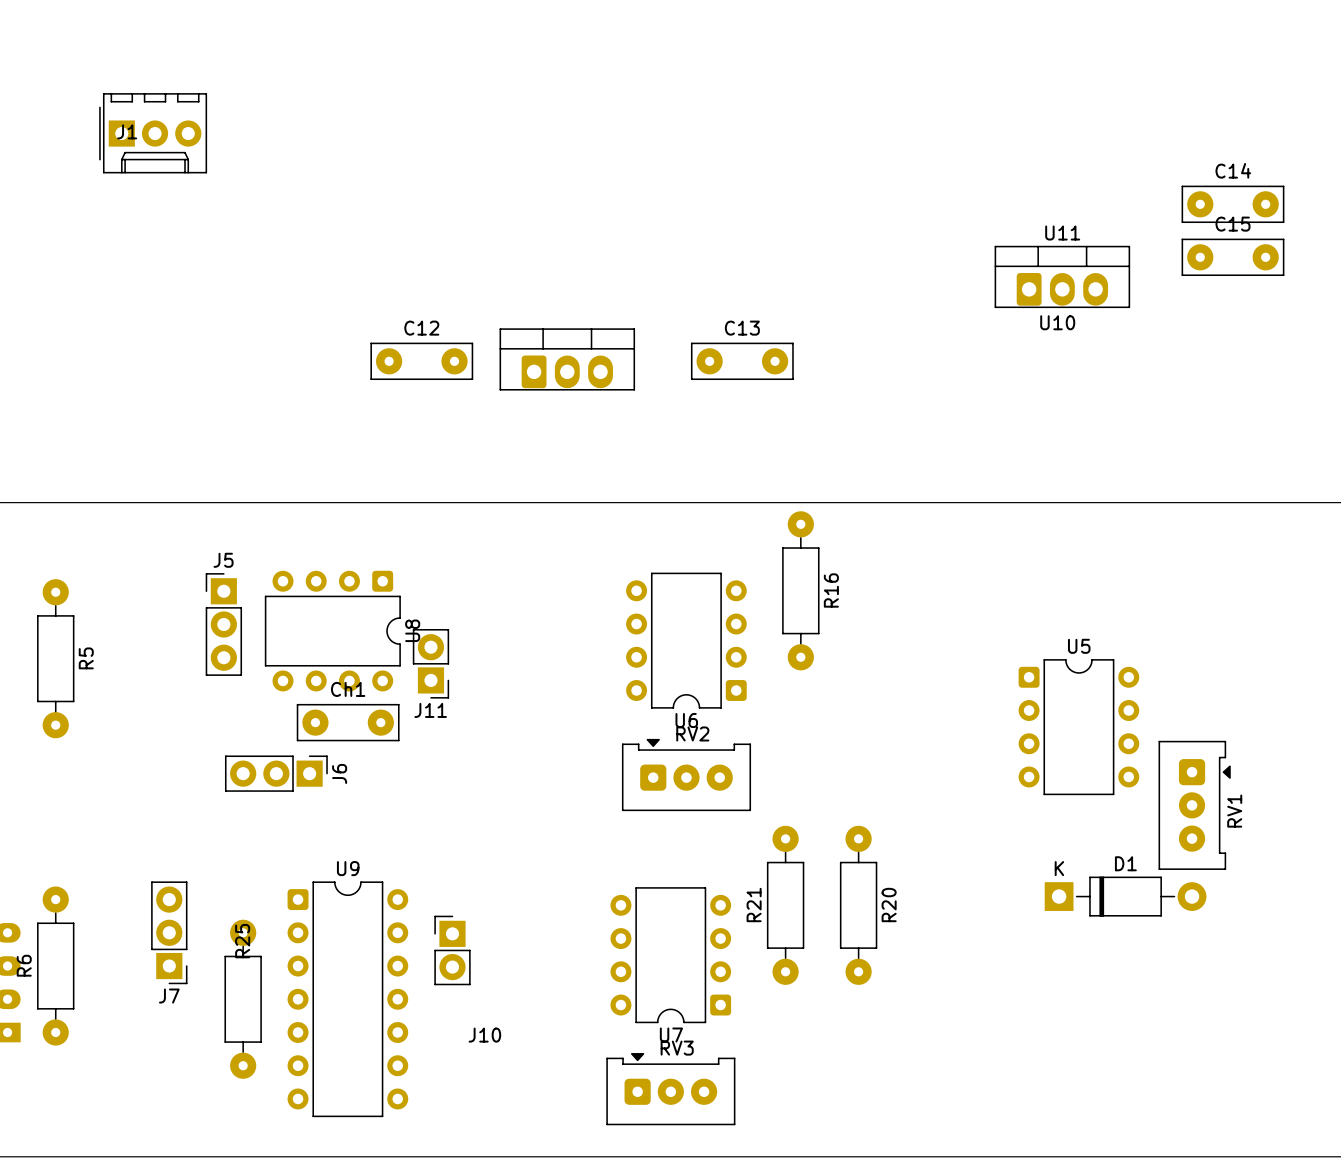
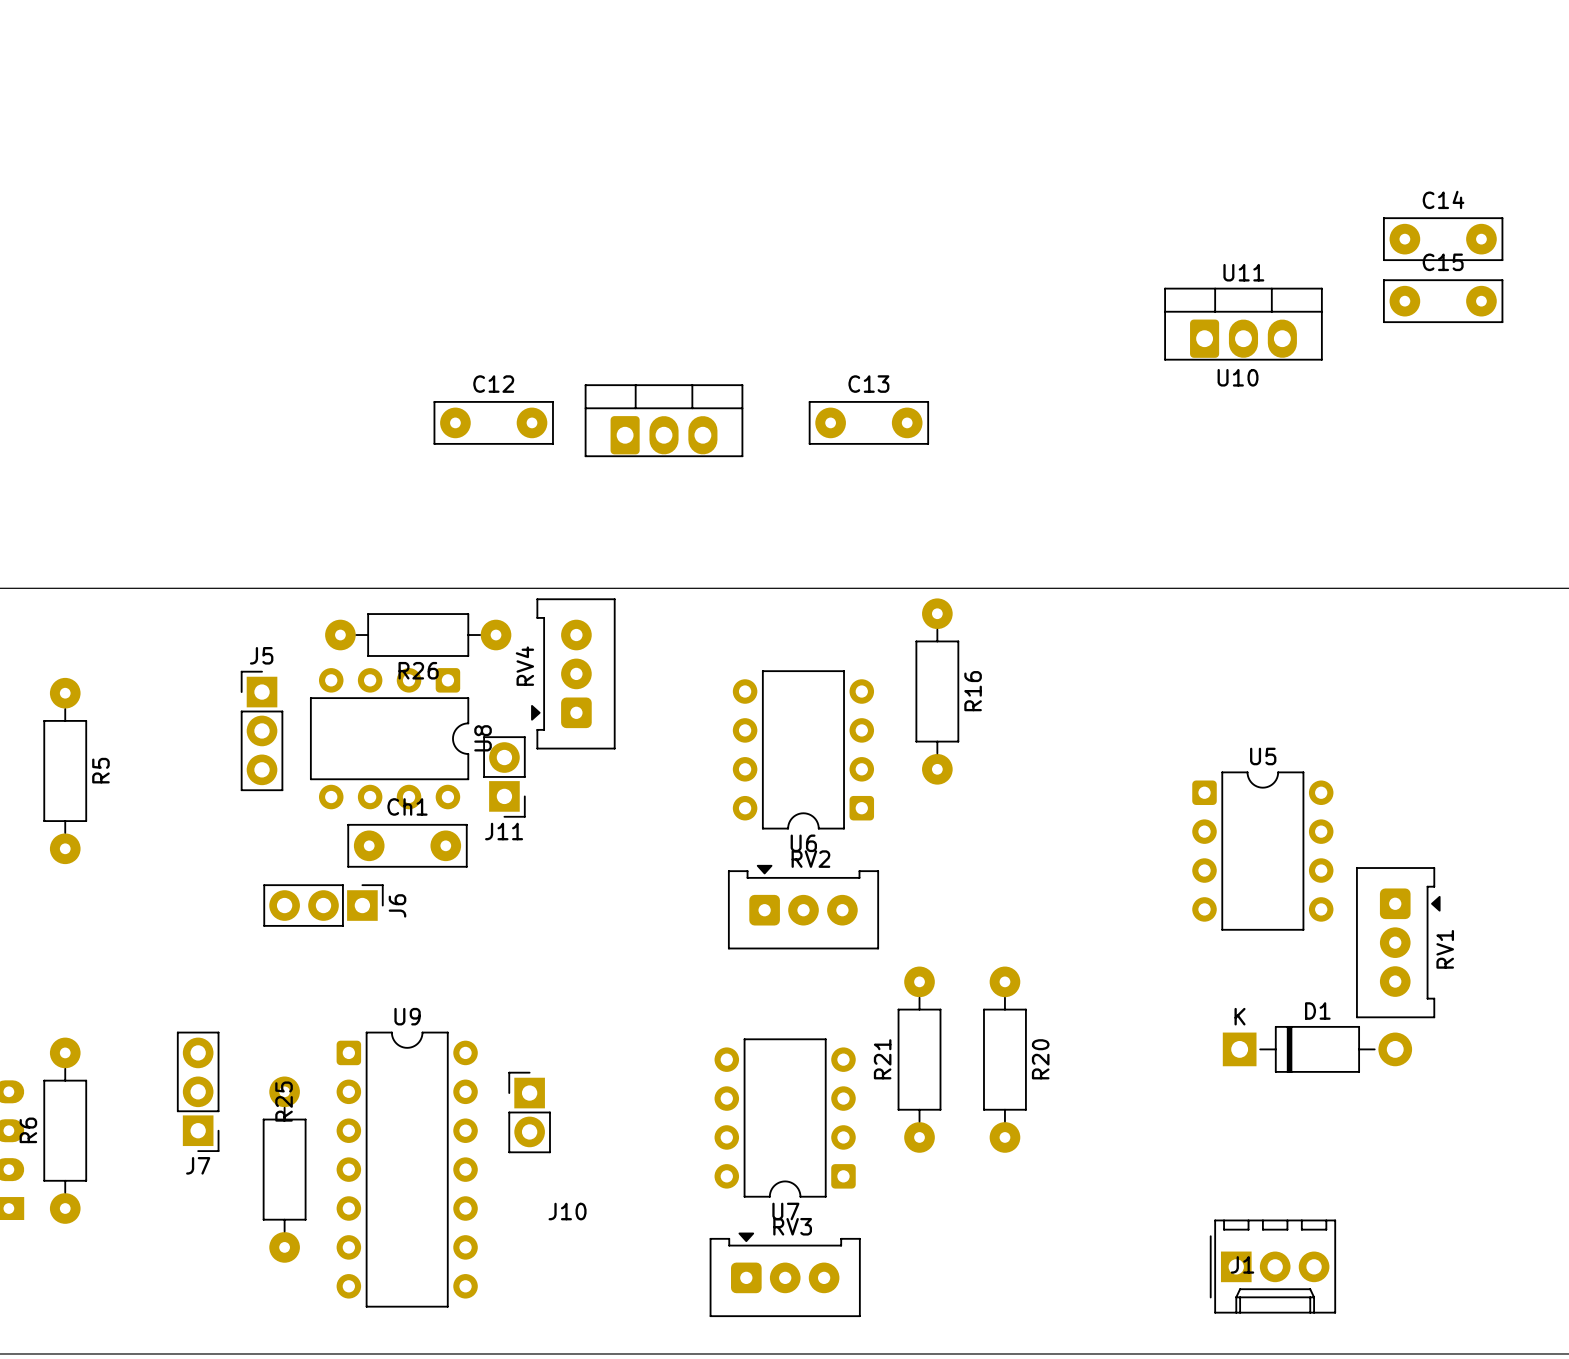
J1 position: (153, 133) -> (1272, 1266)
R26: none -> (418, 635)
RV4: none -> (573, 673)

